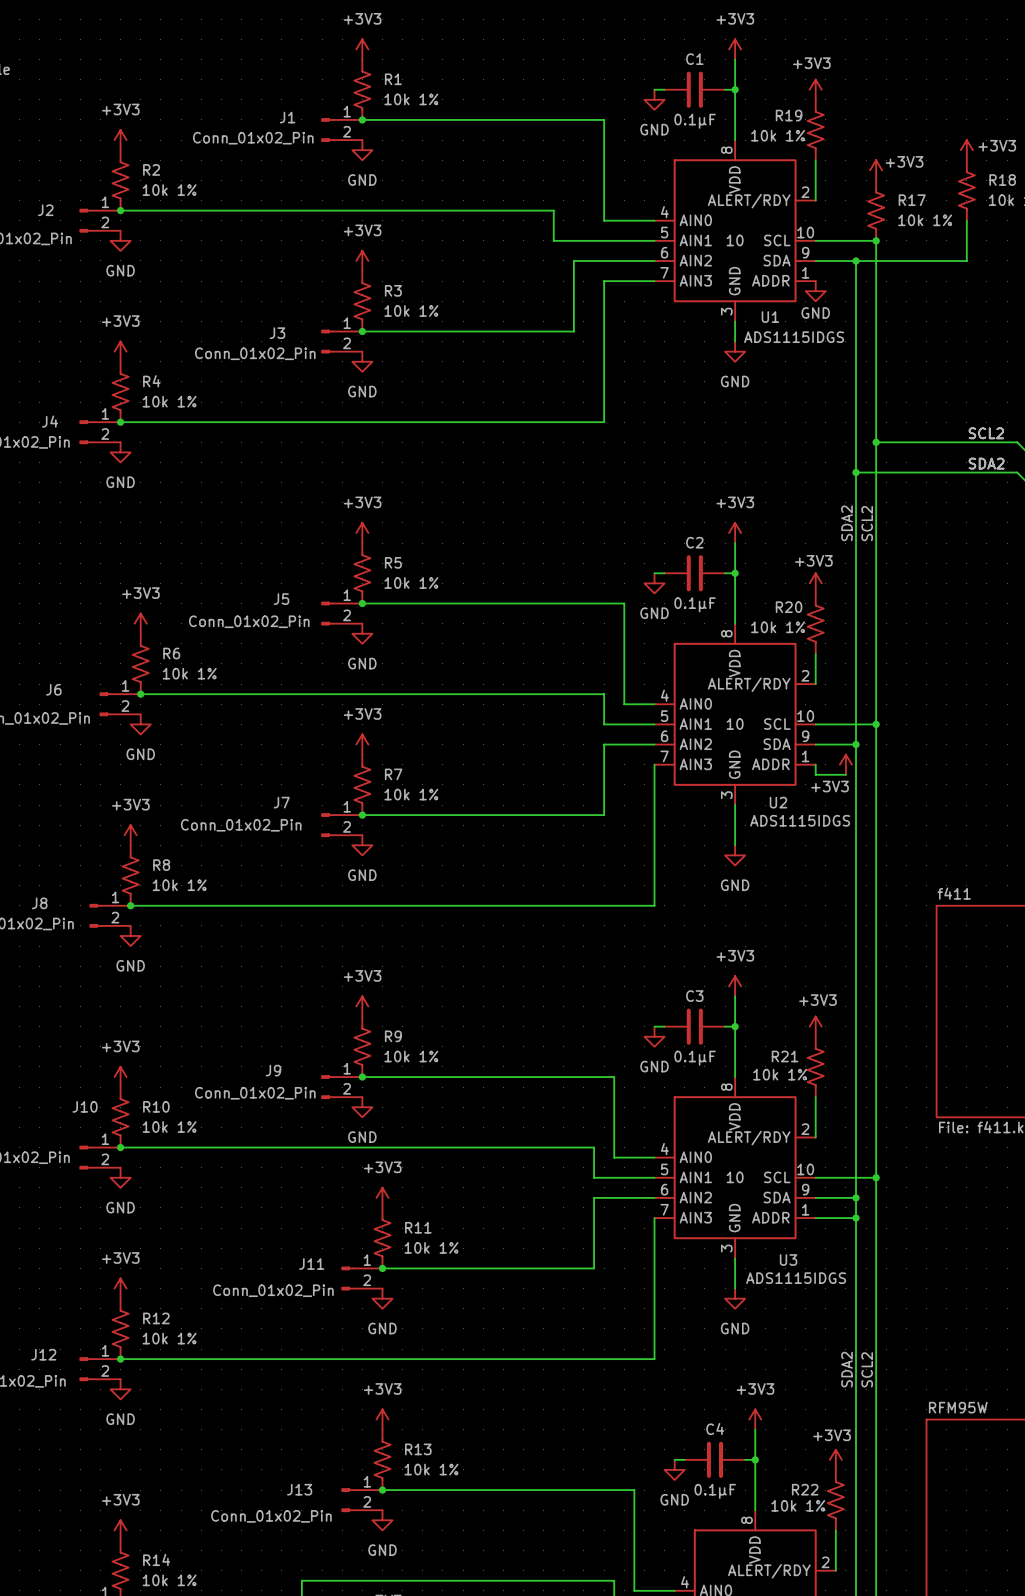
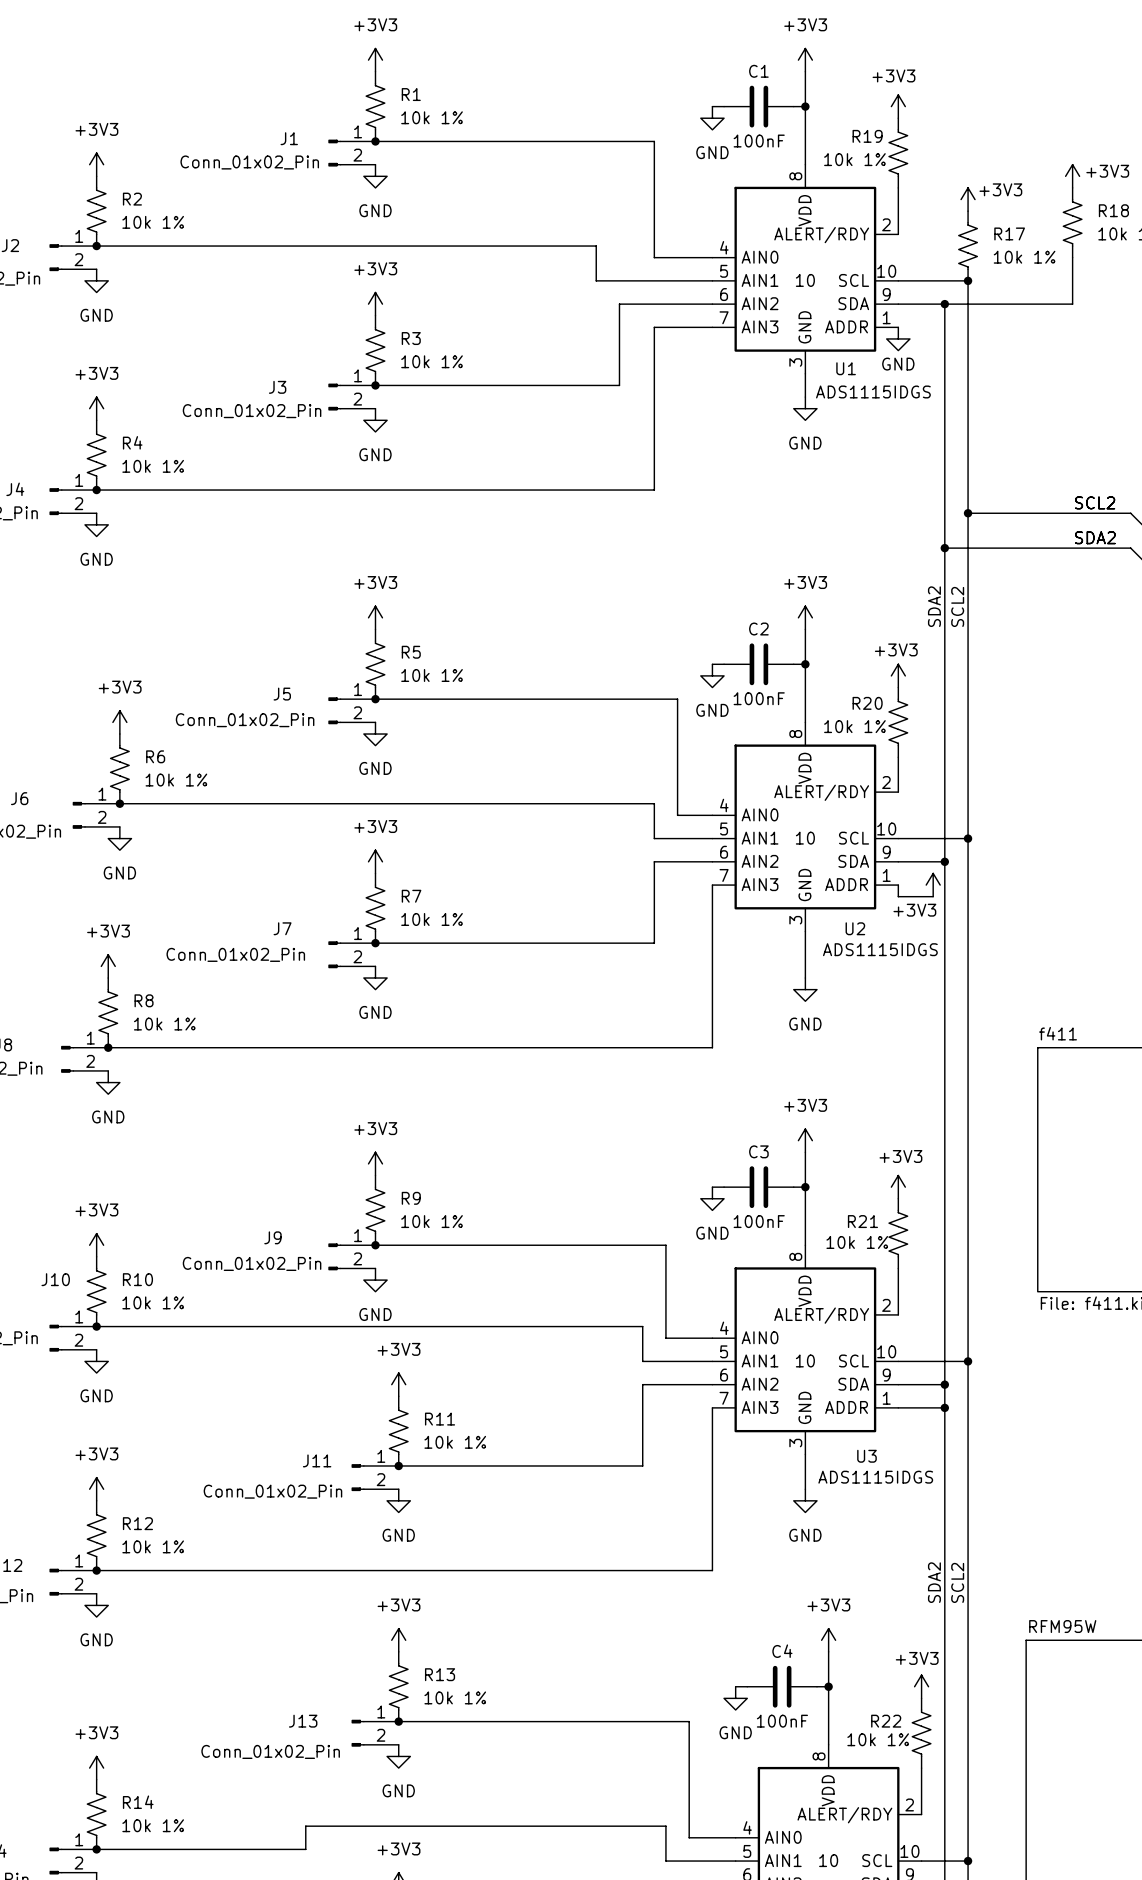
C1 value: 0.1µF (695, 121) -> 100nF (759, 141)
C2 value: 0.1µF (695, 604) -> 100nF (759, 698)
C3 value: 0.1µF (695, 1058) -> 100nF (759, 1221)
C4 value: 0.1µF (715, 1491) -> 100nF (782, 1721)

